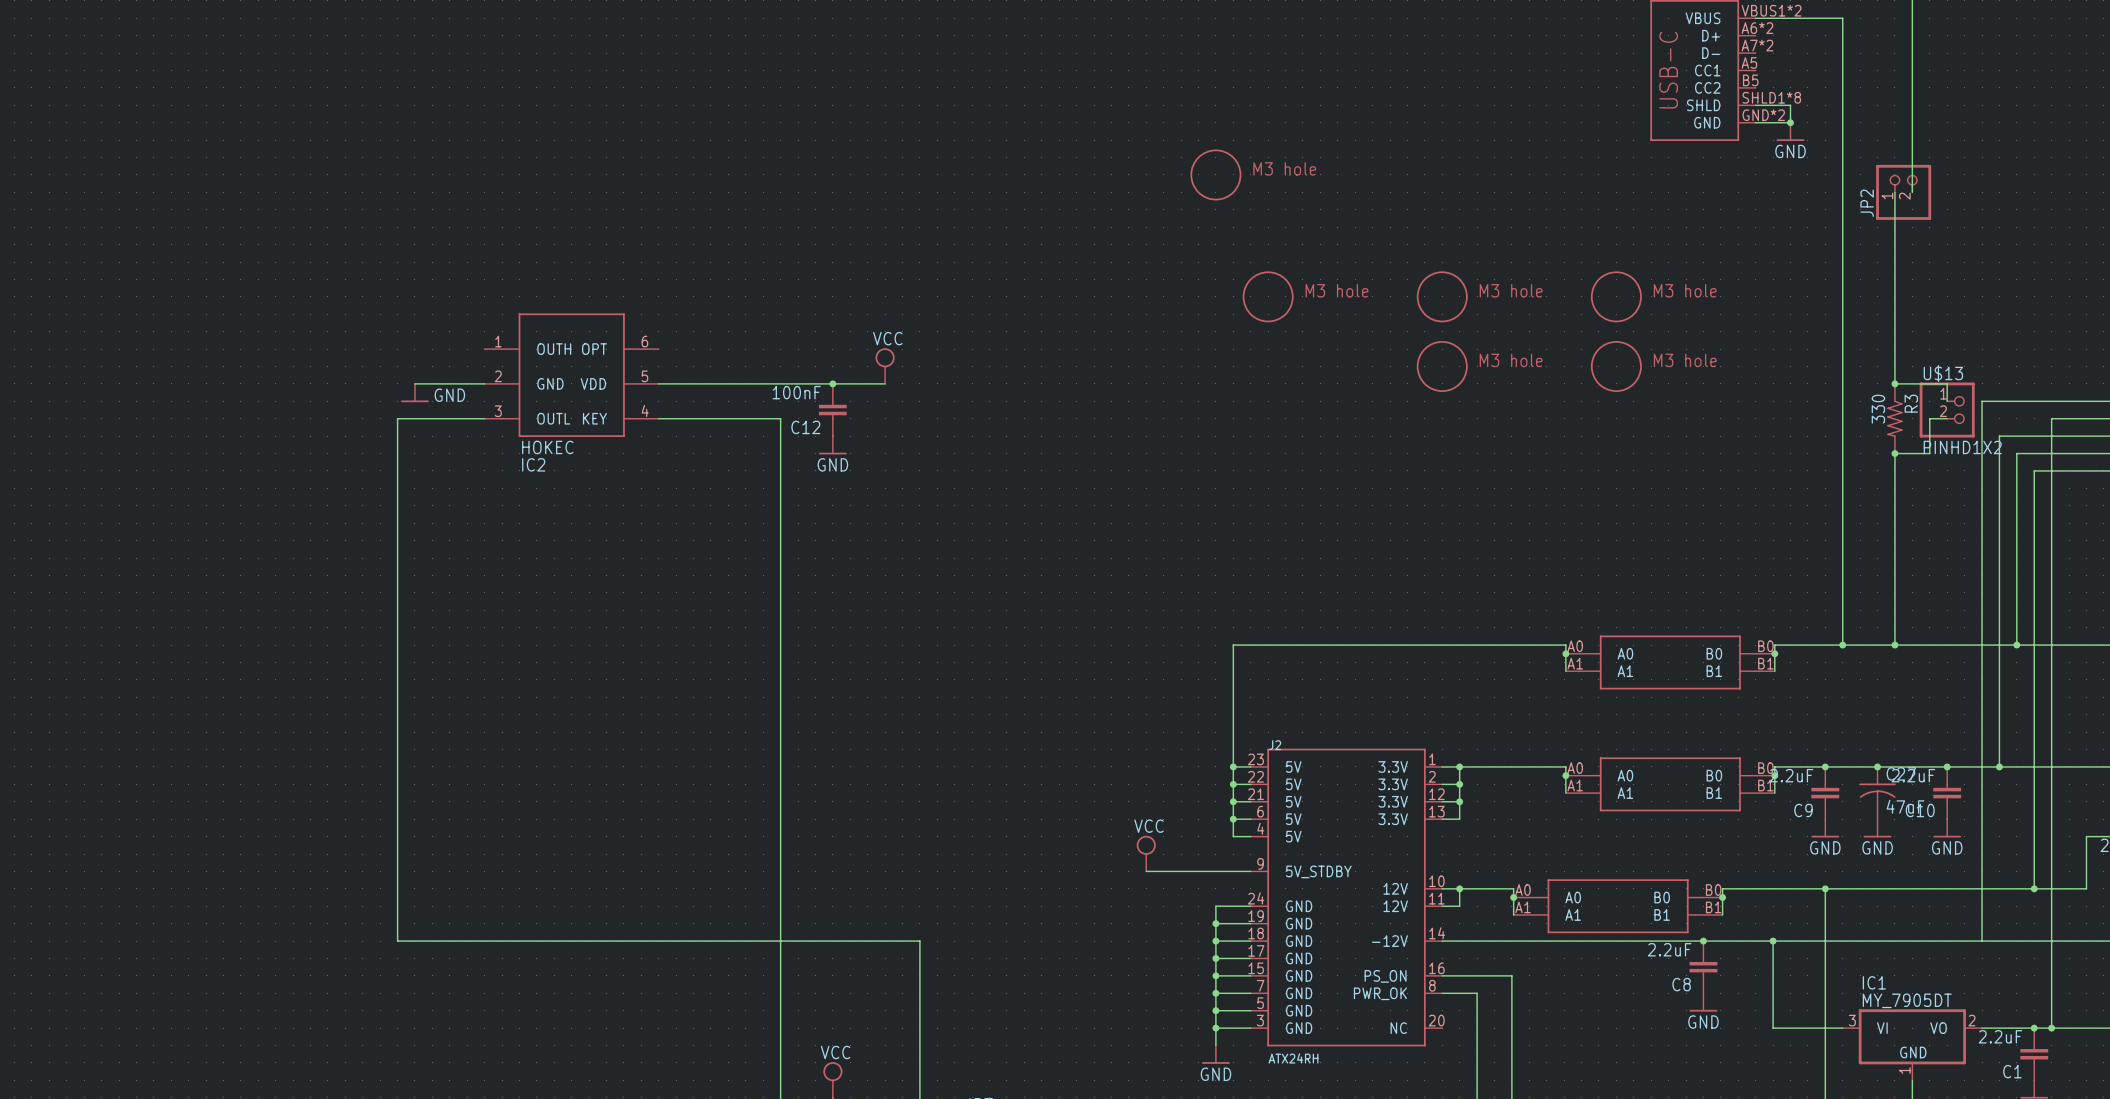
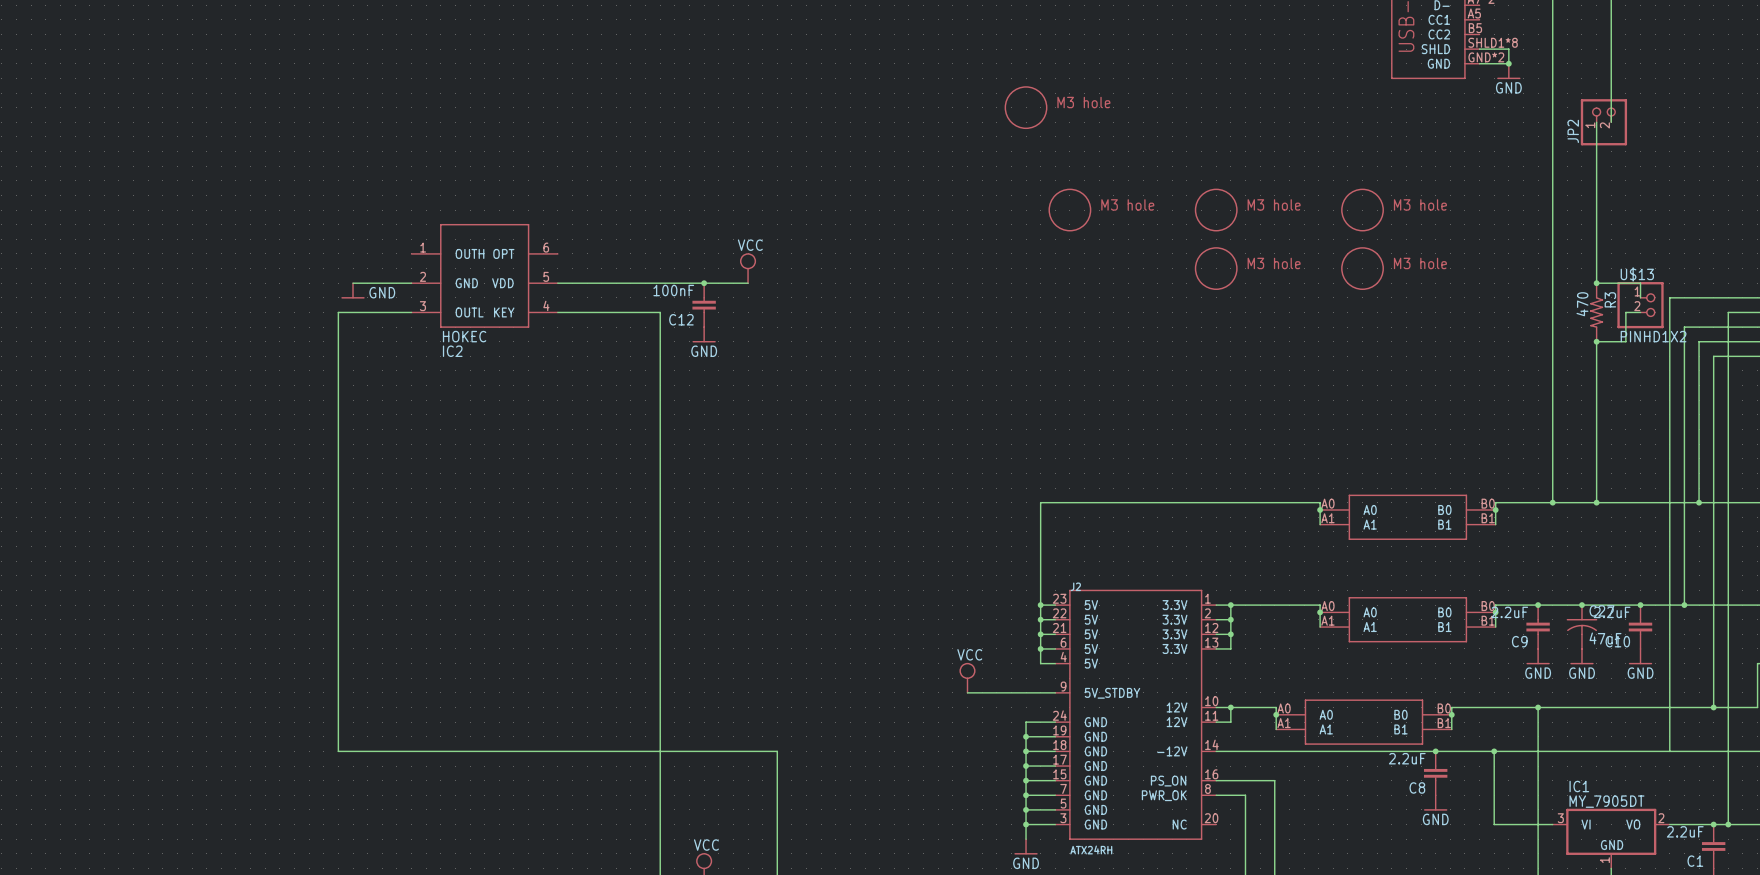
R3 value: 330 (1878, 409) -> 470 (1582, 304)

